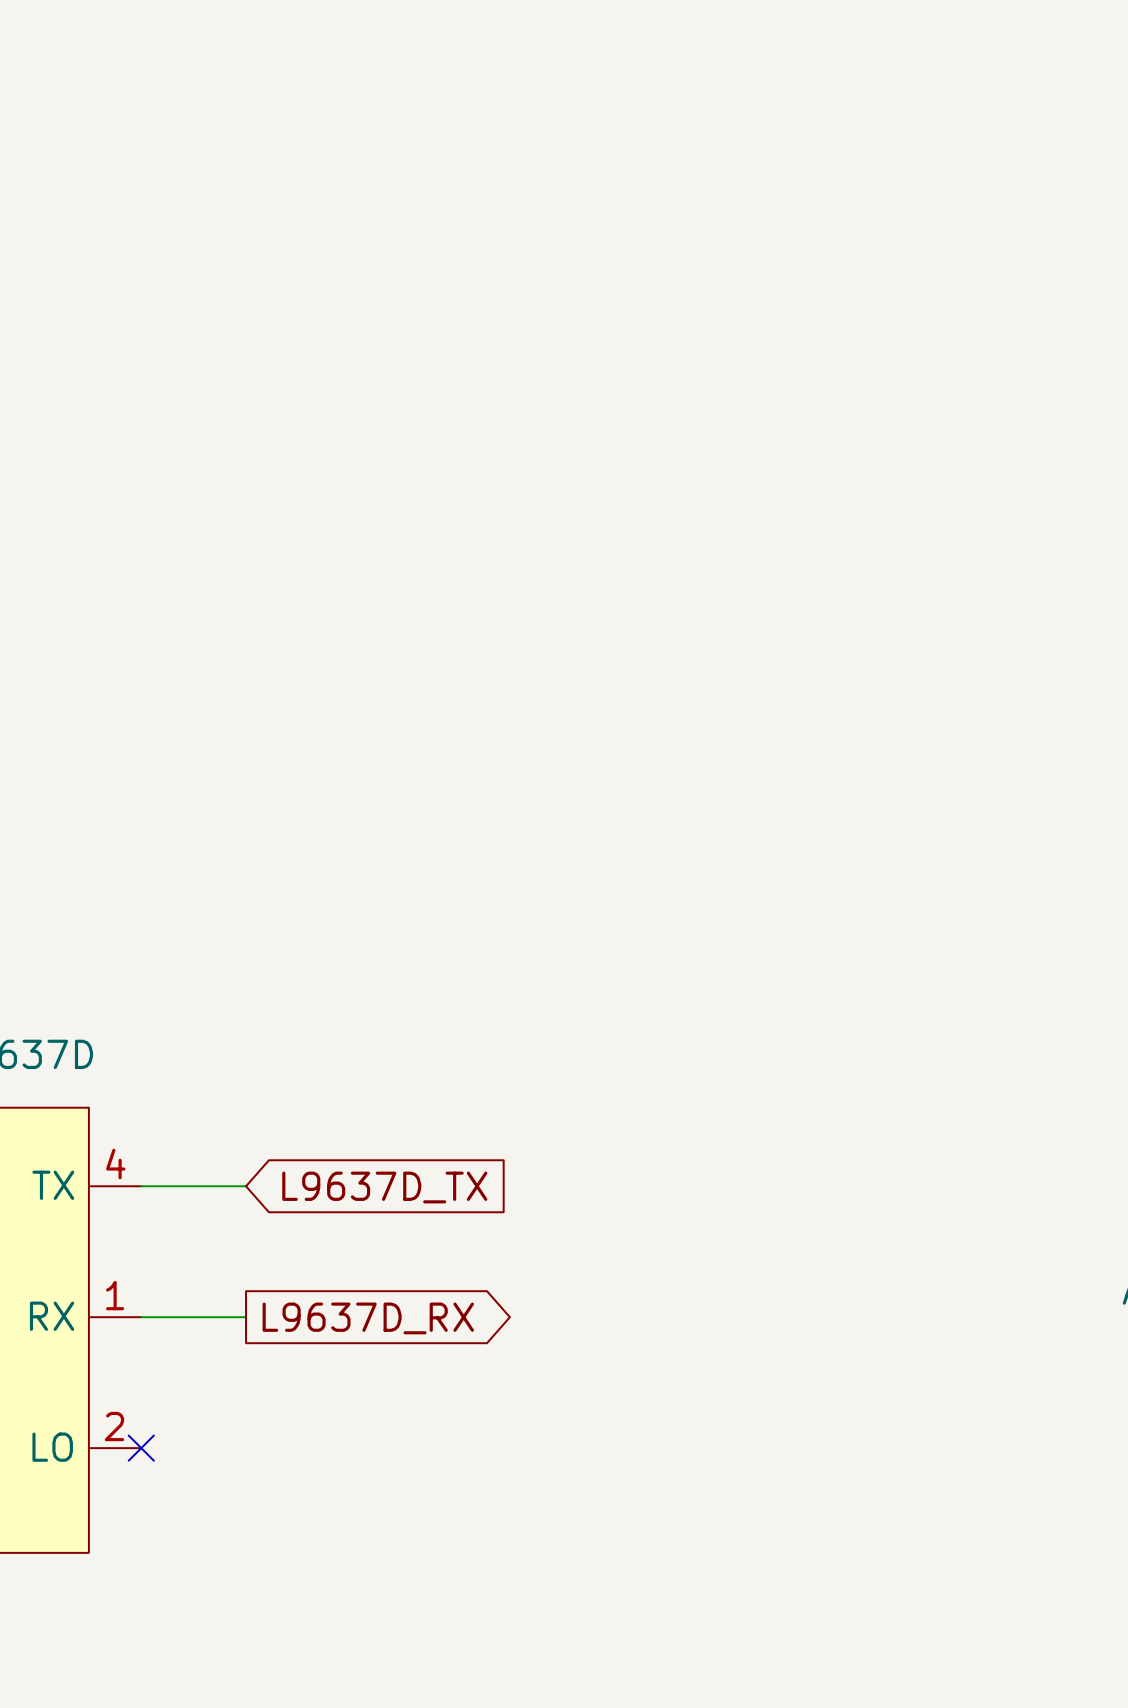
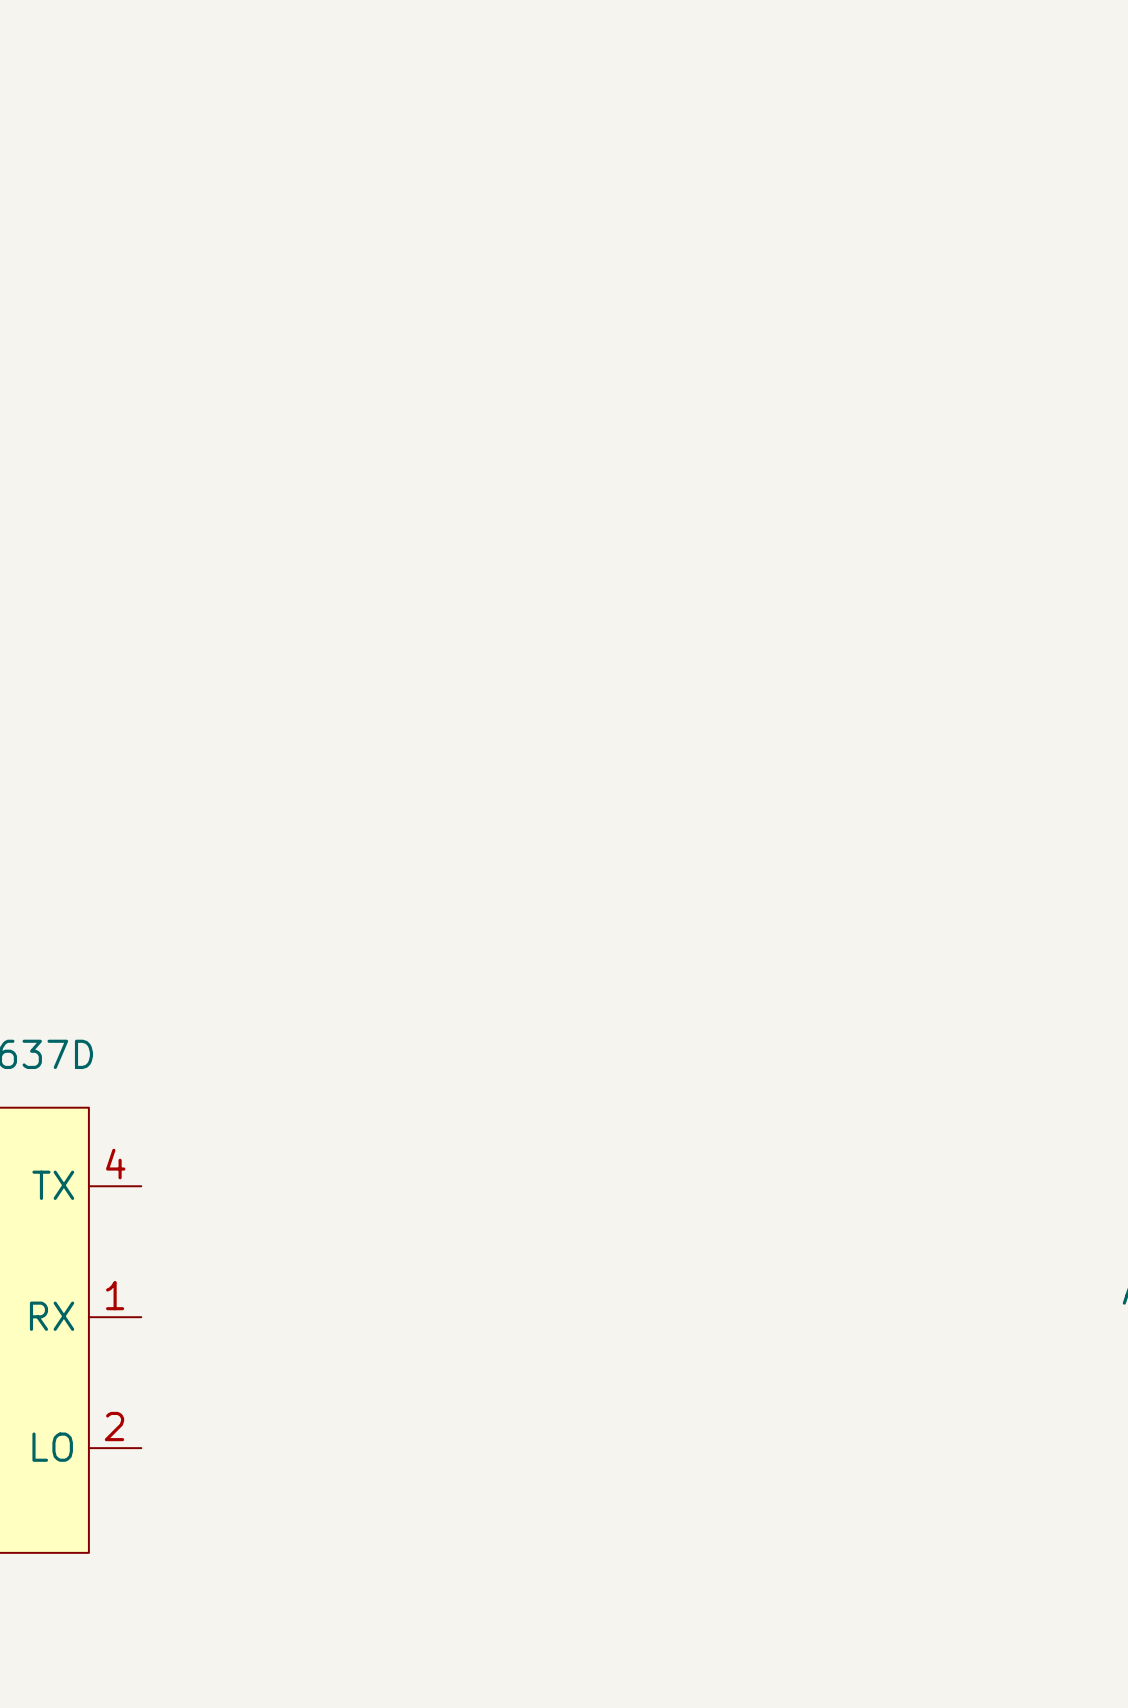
wire: (141, 1186) (246, 1186) -> none
global label: L9637D_TX (384, 1187) -> none
wire: (141, 1317) (246, 1317) -> none
global label: L9637D_RX (368, 1318) -> none
no-connect mark: (141, 1448) -> none

